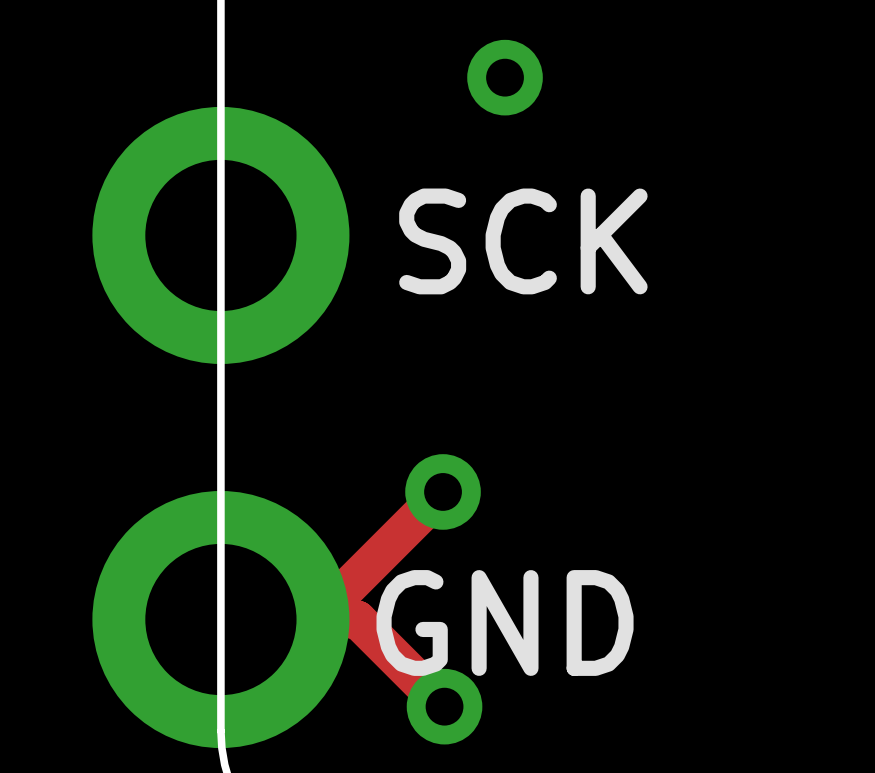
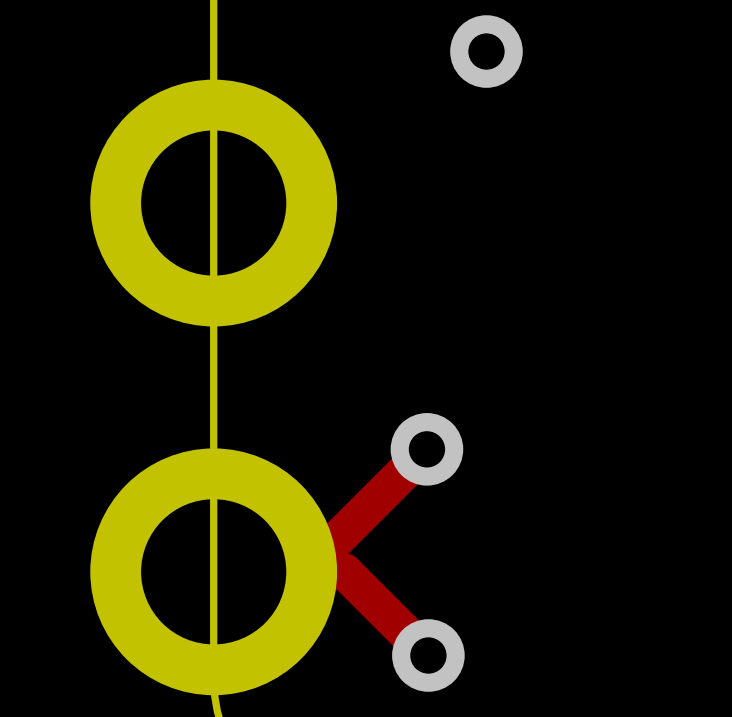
text: SCK (523, 241) -> none
text: GND (505, 622) -> none

